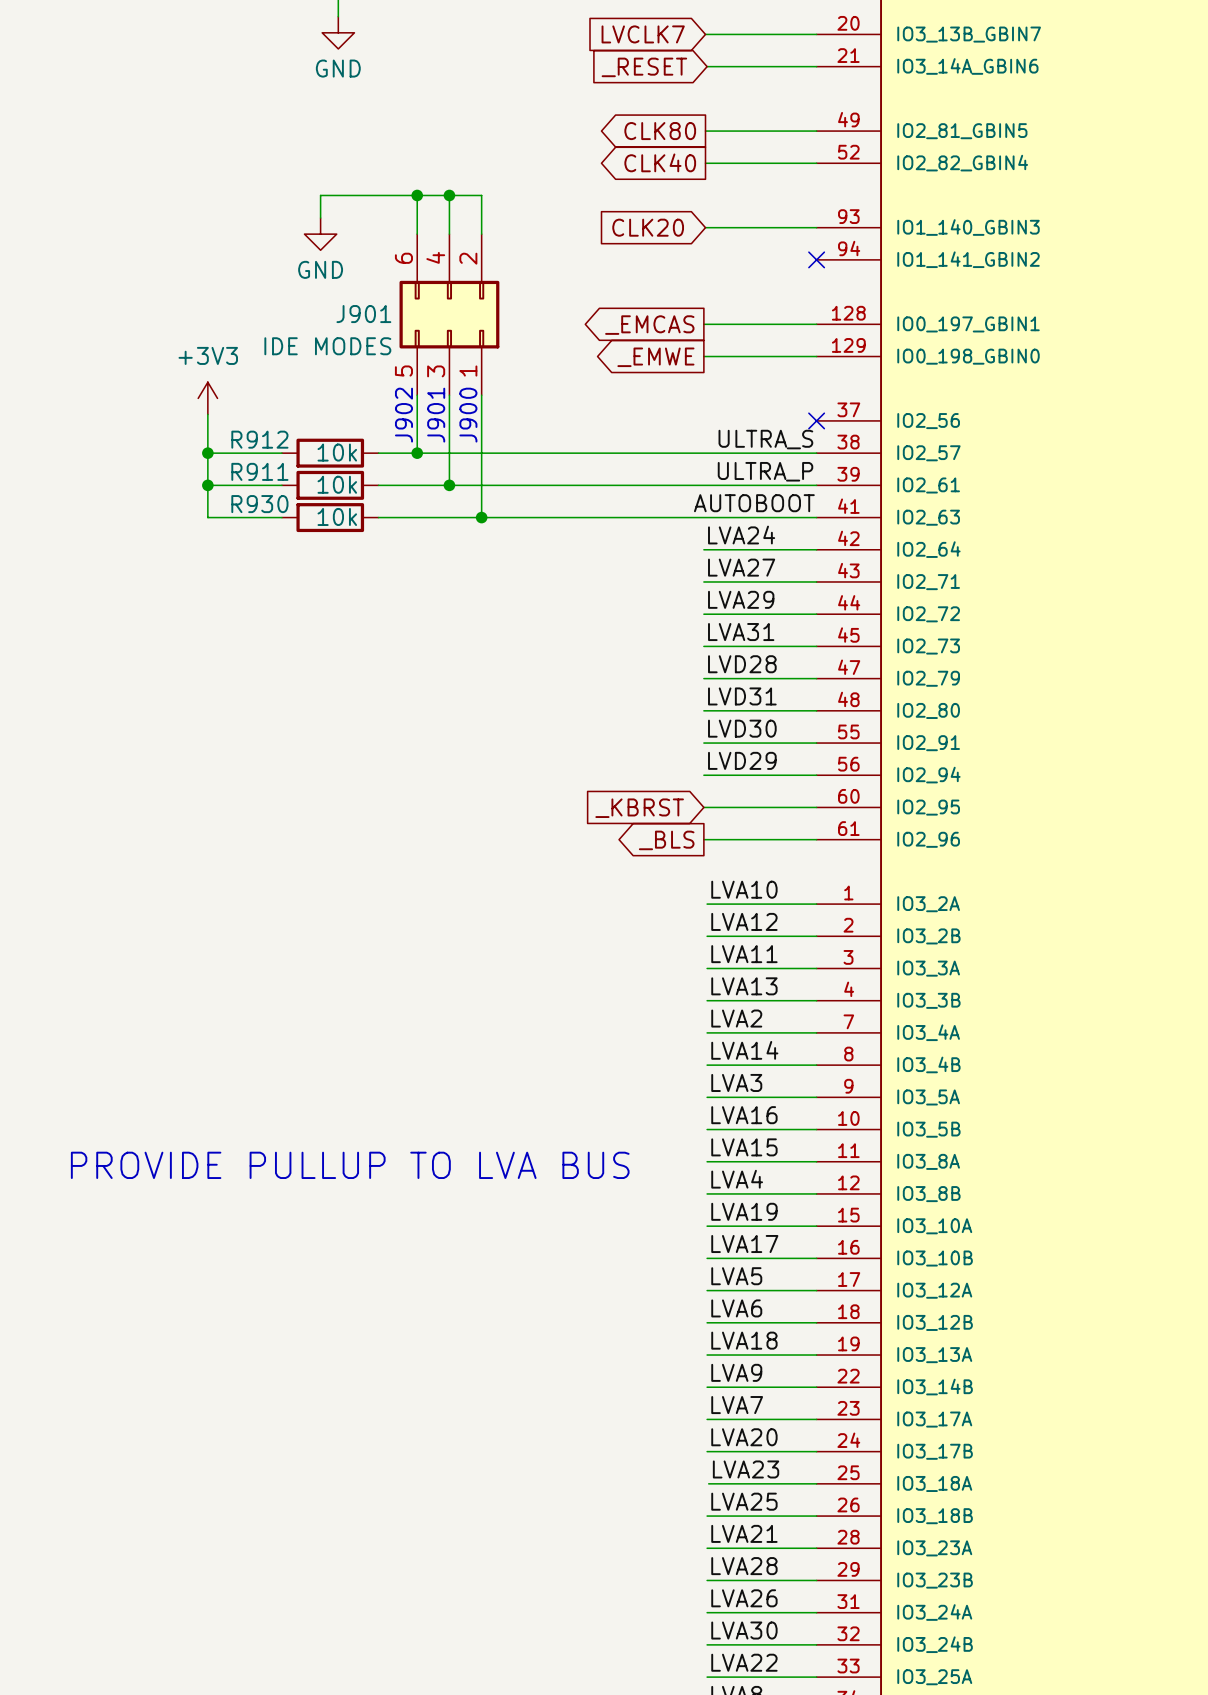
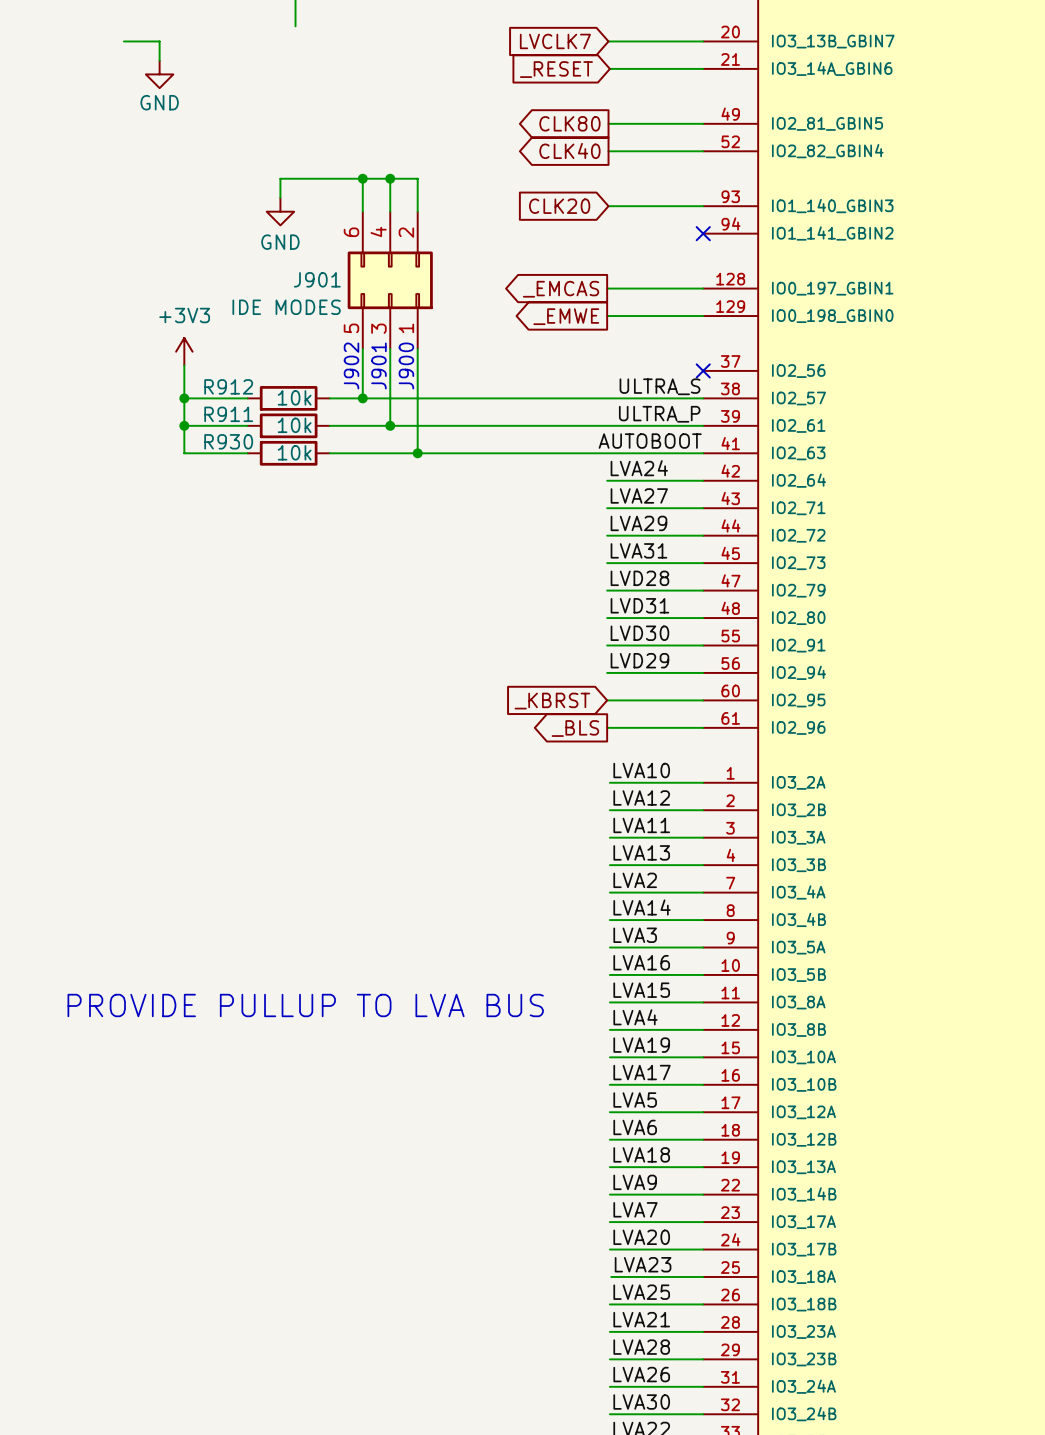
power symbol: GND (338, 32) -> none
wire: none -> (123, 41) (159, 41) (159, 60)
power symbol: none -> GND (159, 74)

